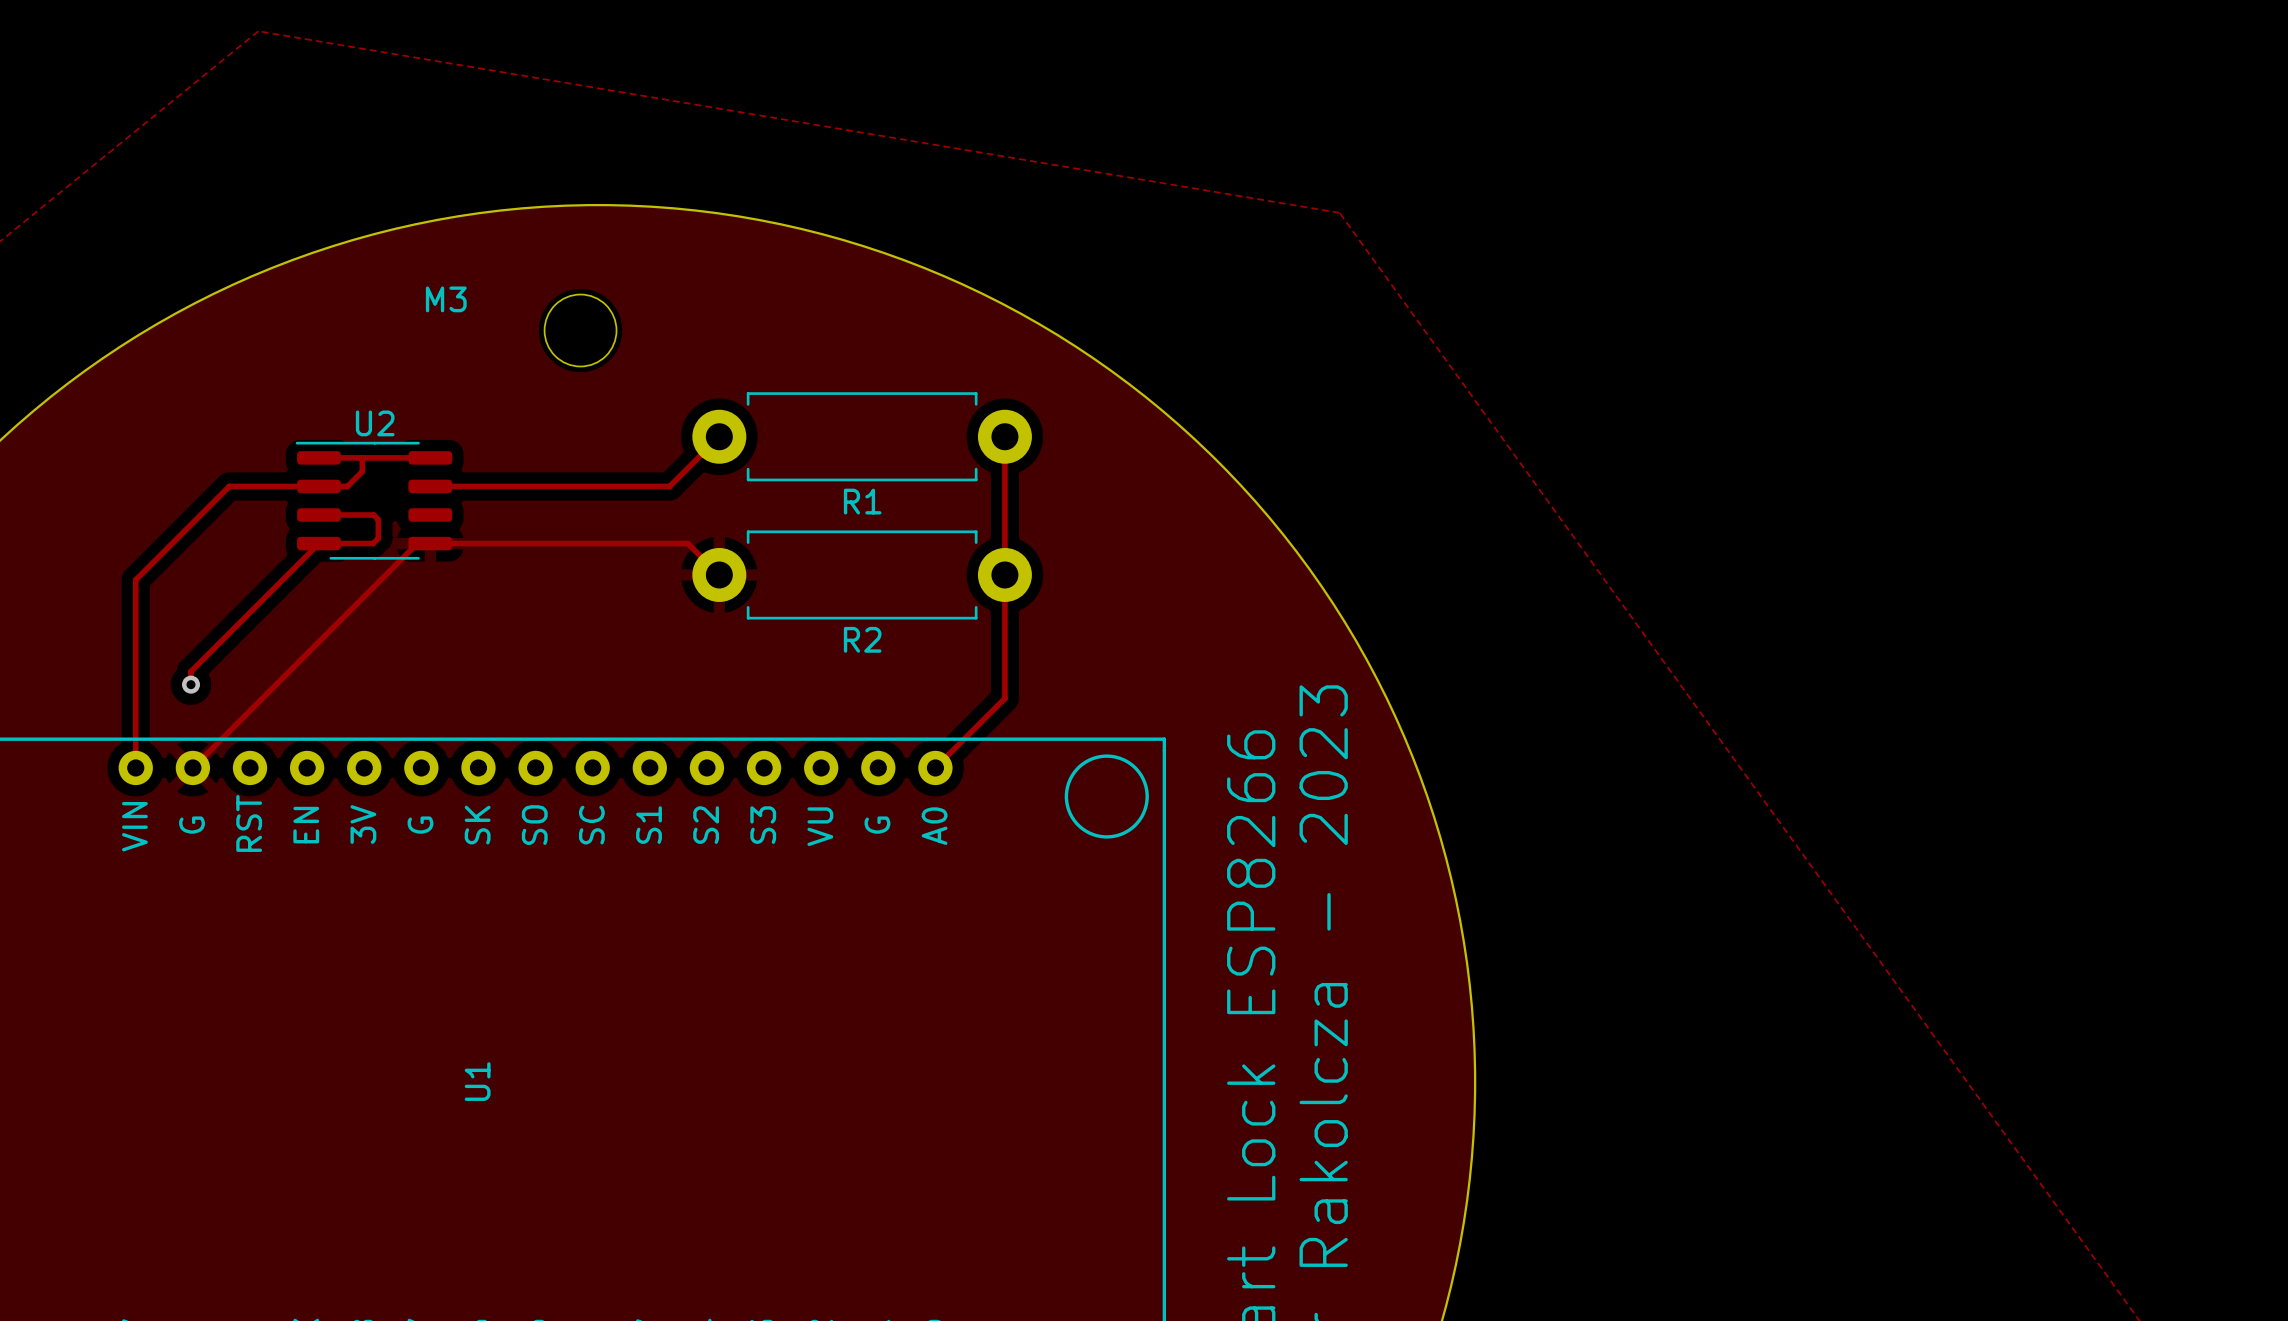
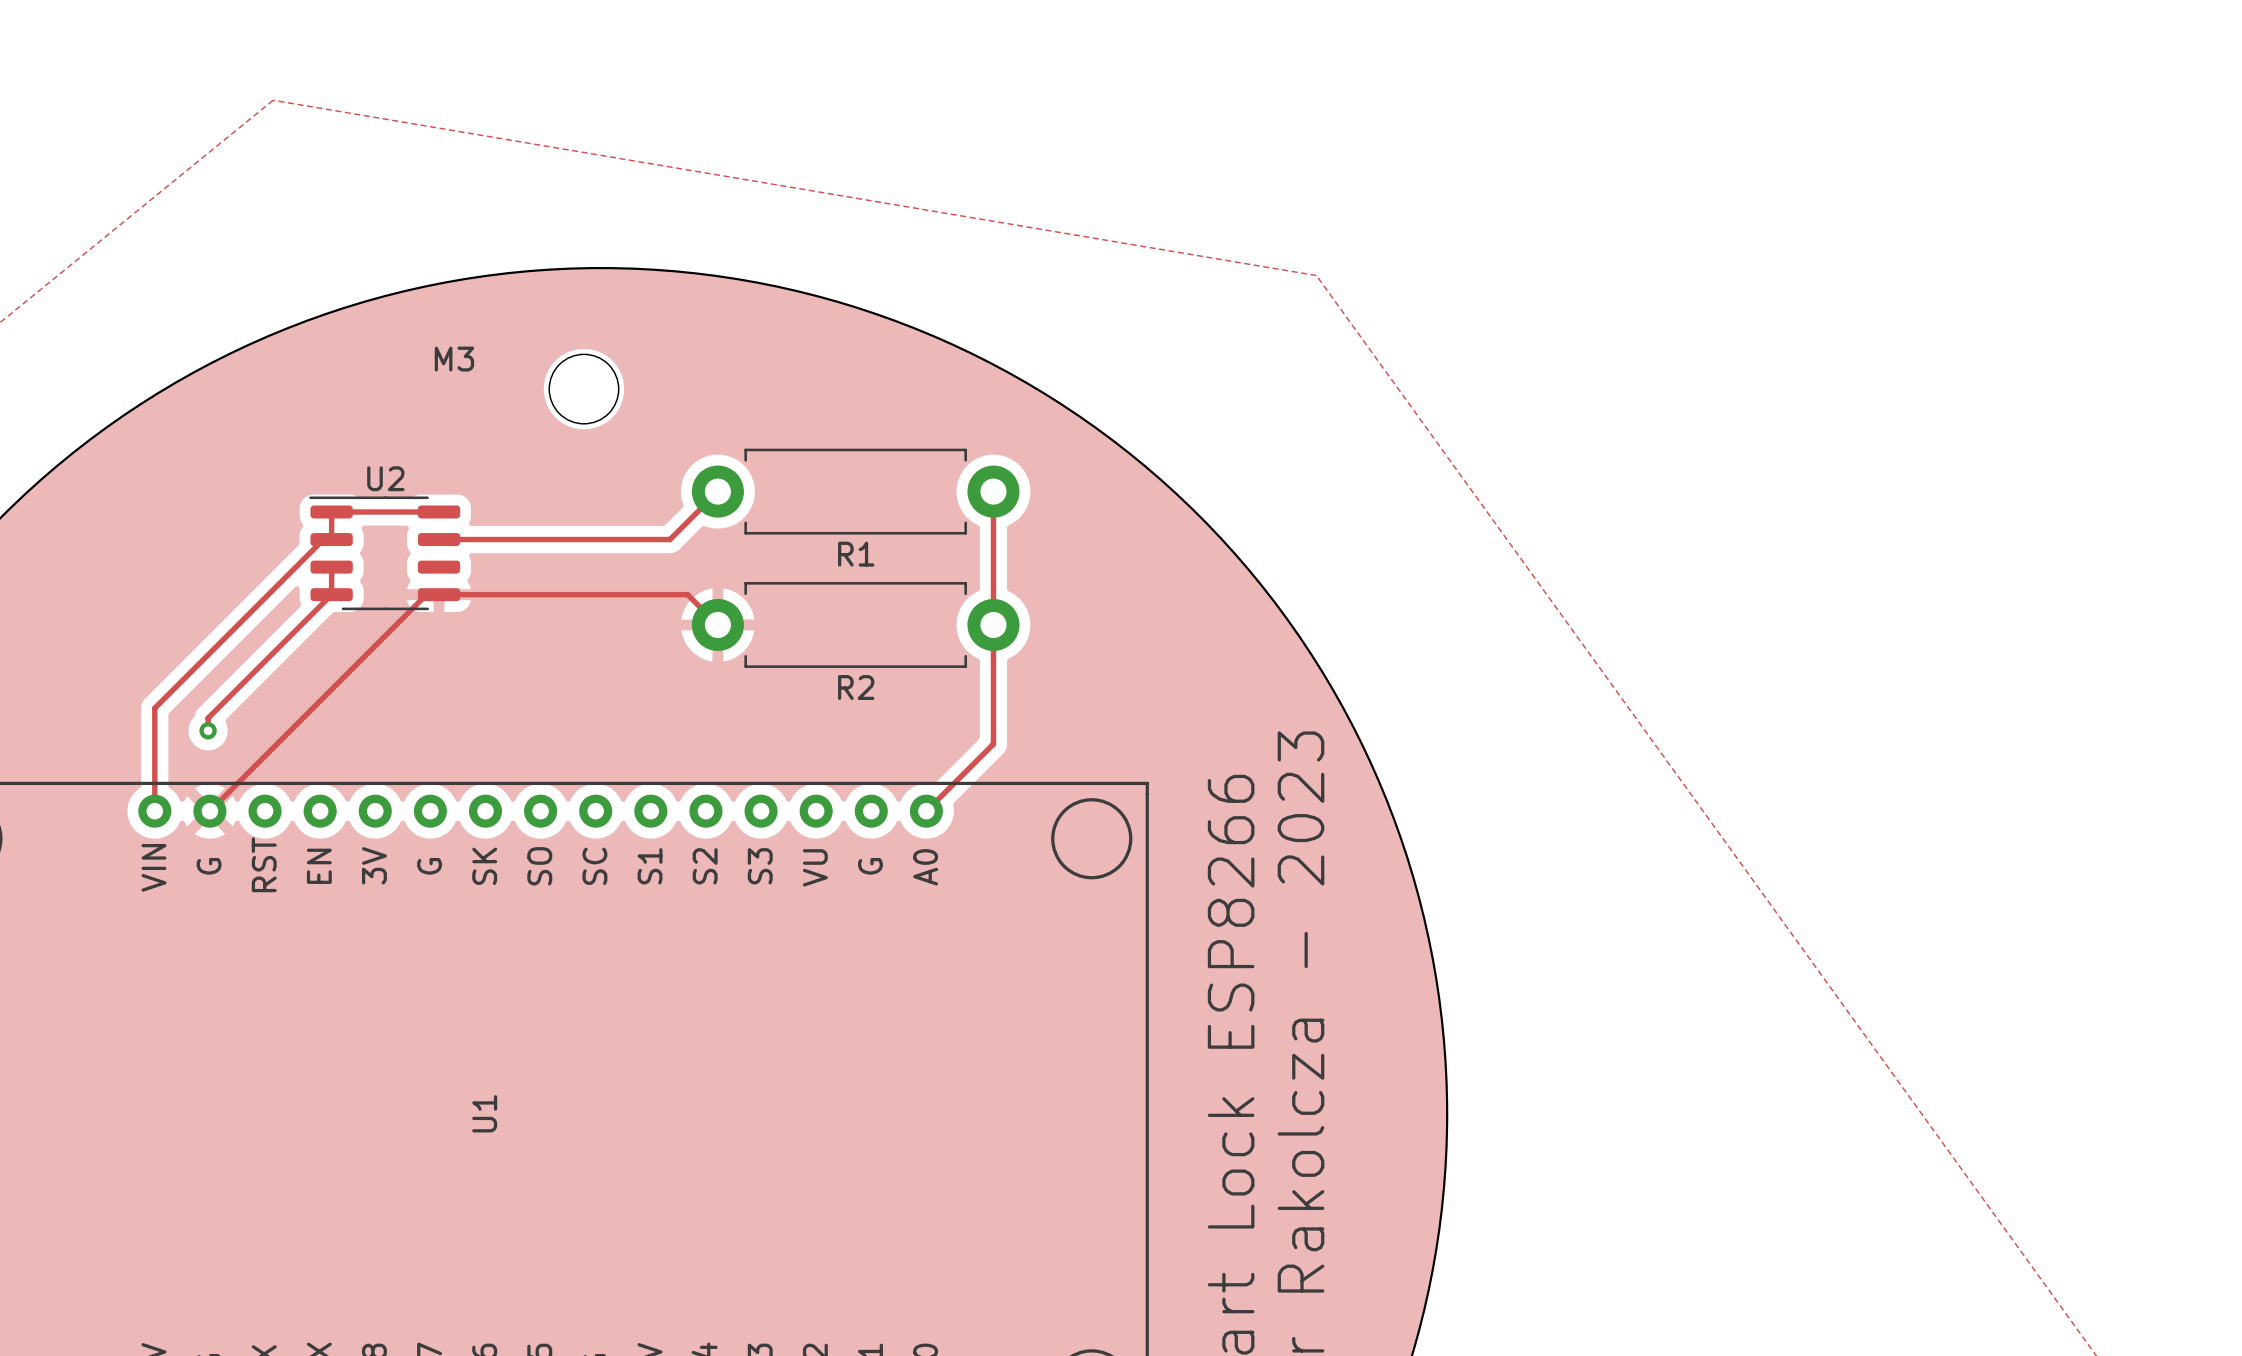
track: (362, 457) (362, 471) (347, 486) (319, 486) -> (331, 511) (331, 539)
track: (310, 486) (229, 486) (135, 579) (135, 661) -> (323, 539) (154, 708)
track: (319, 515) (373, 515) (378, 519) (378, 538) (373, 543) (319, 543) -> (331, 567) (331, 594)

